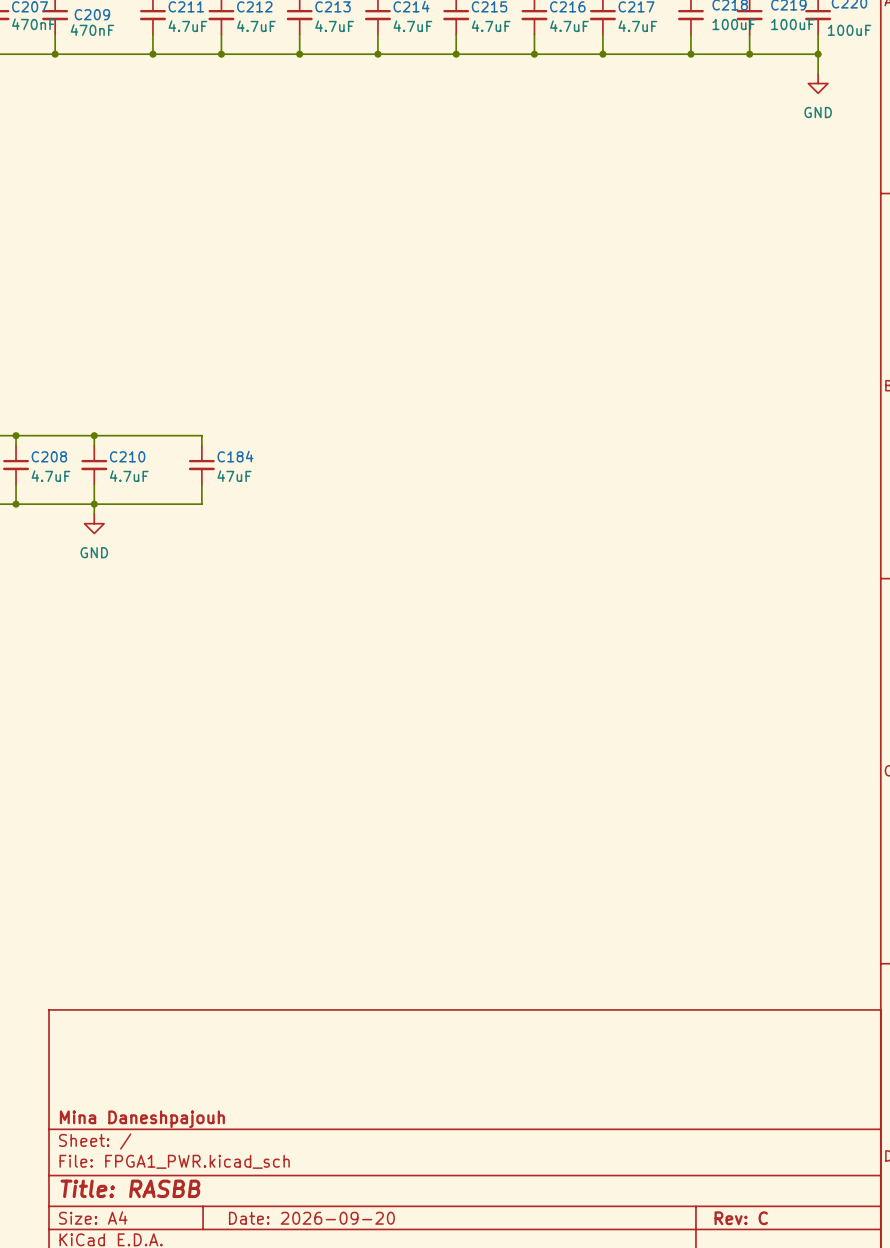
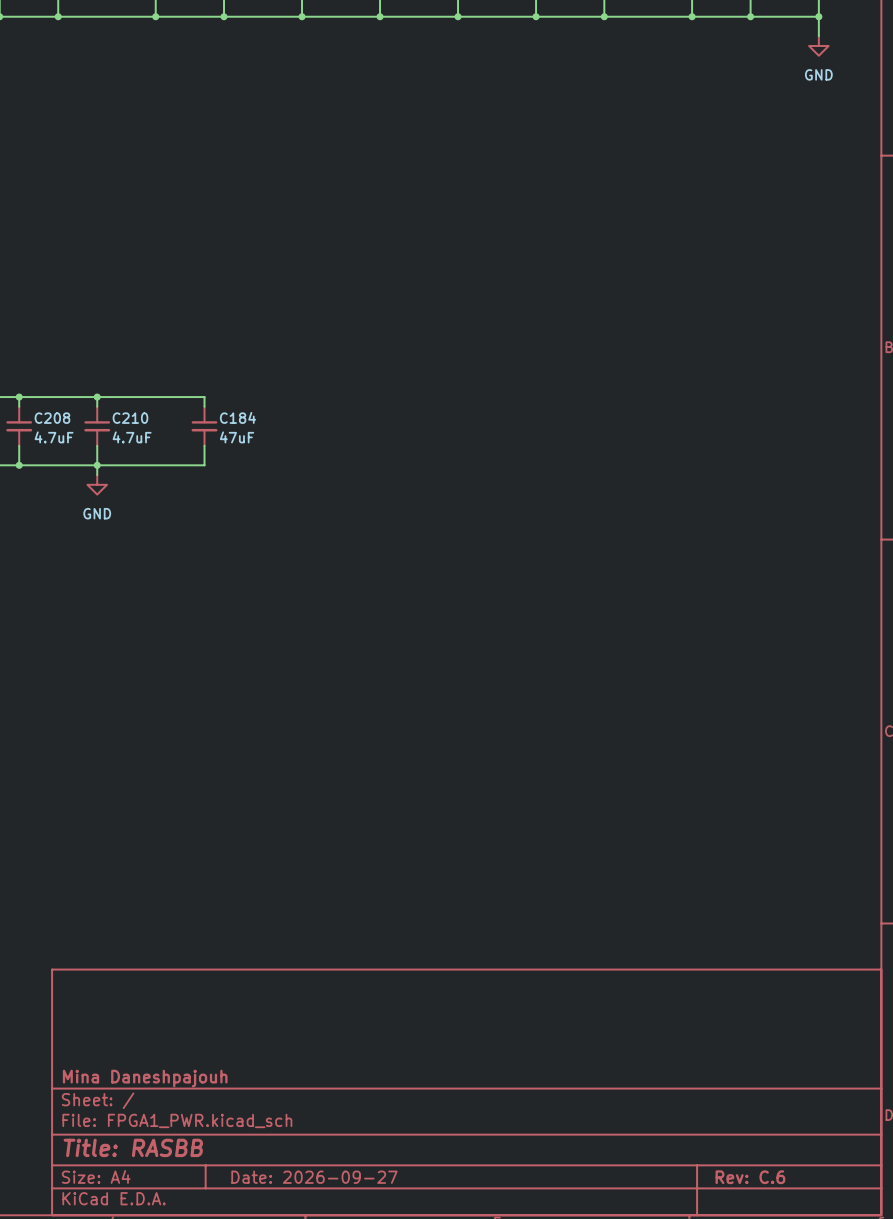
title block: Date: 2026-09-20 (311, 1218) -> Date: 2026-09-27 (314, 1177)
title block: Rev: C (741, 1218) -> Rev: C.6 (750, 1177)

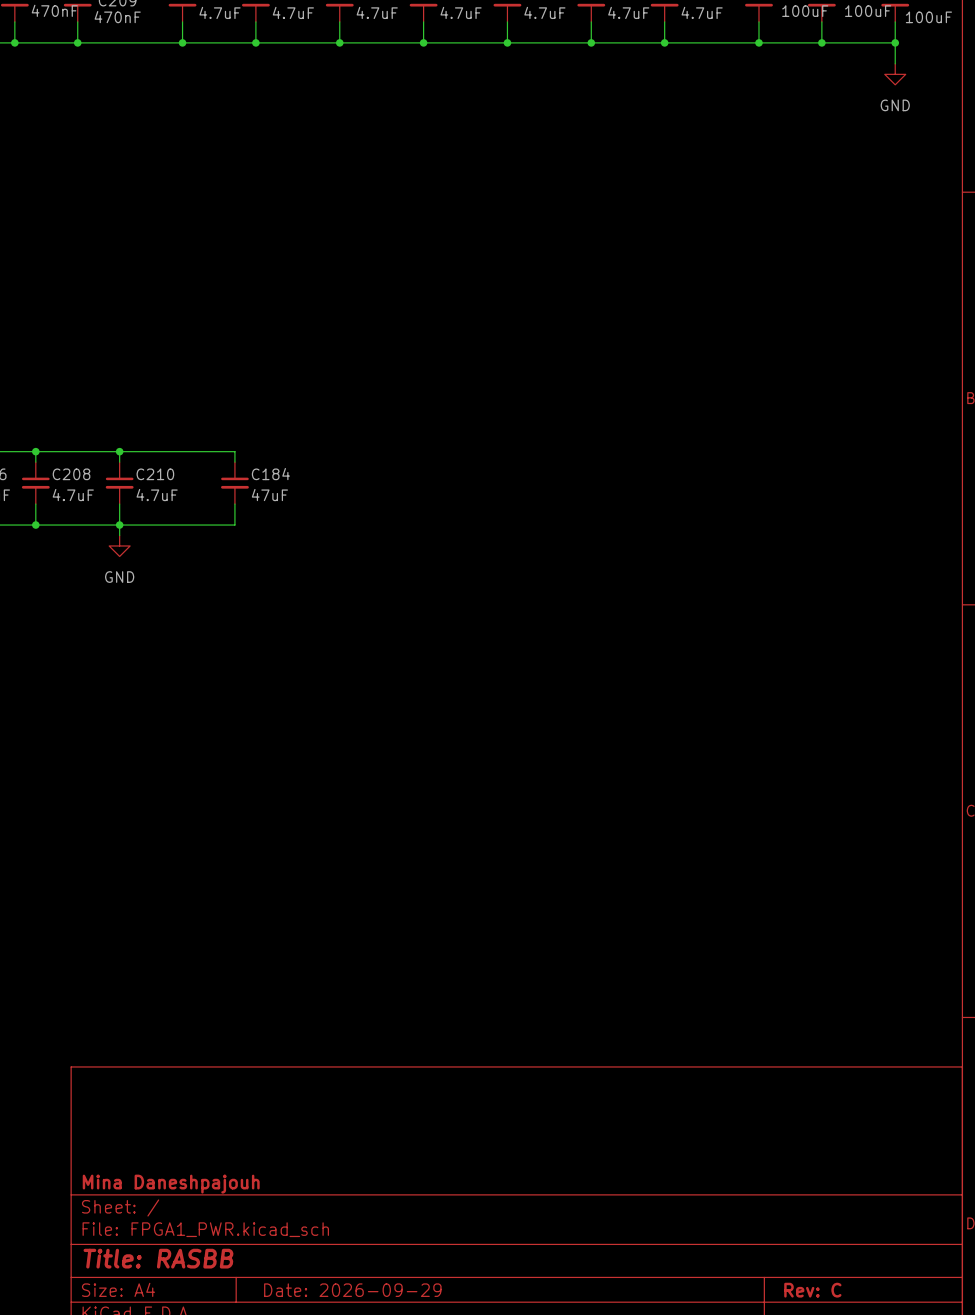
title block: Date: 2026-09-27 (314, 1177) -> Date: 2026-09-29 (352, 1290)
title block: Rev: C.6 (750, 1177) -> Rev: C (812, 1290)

